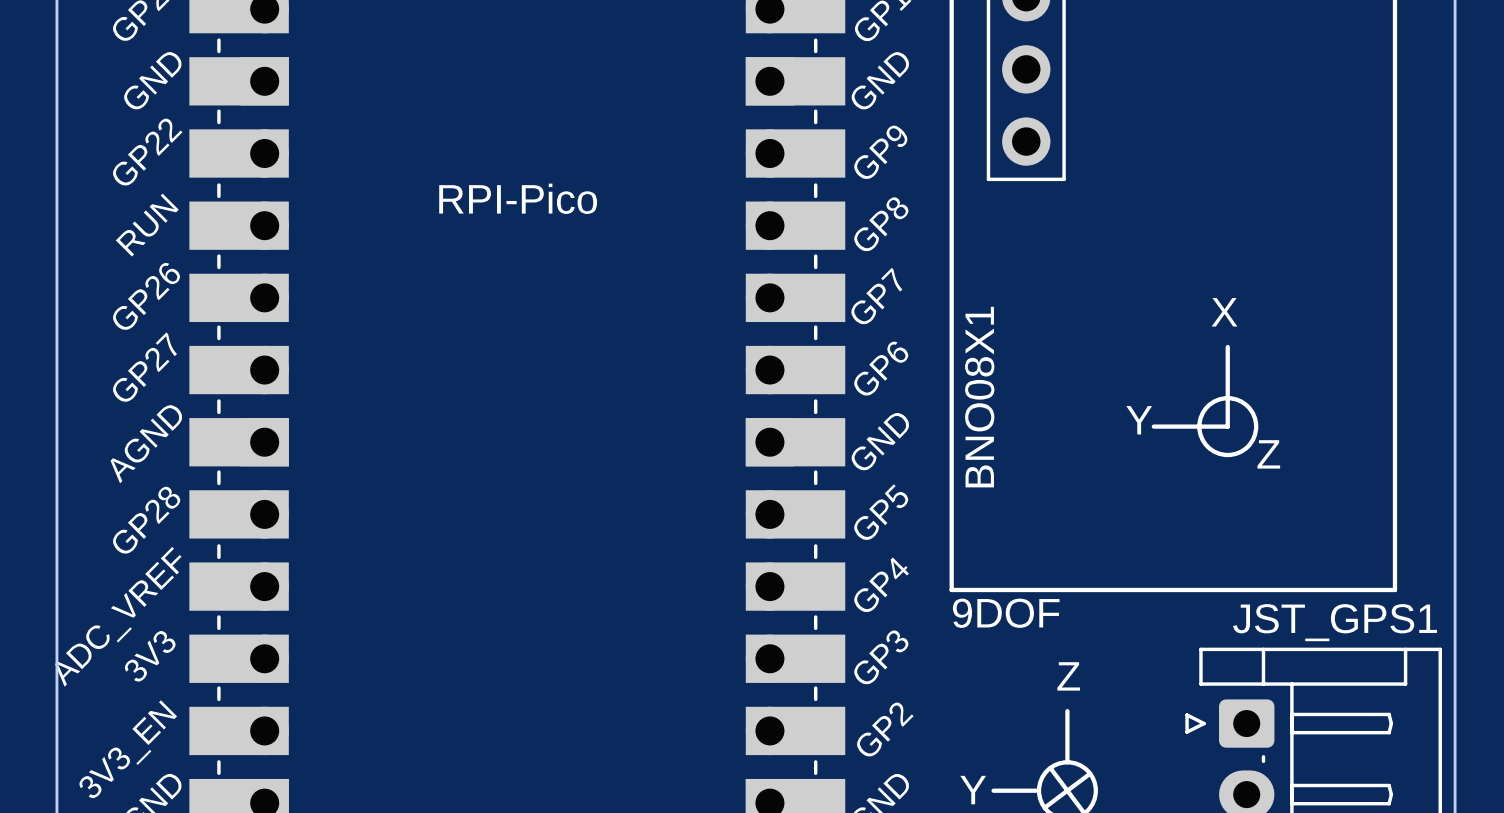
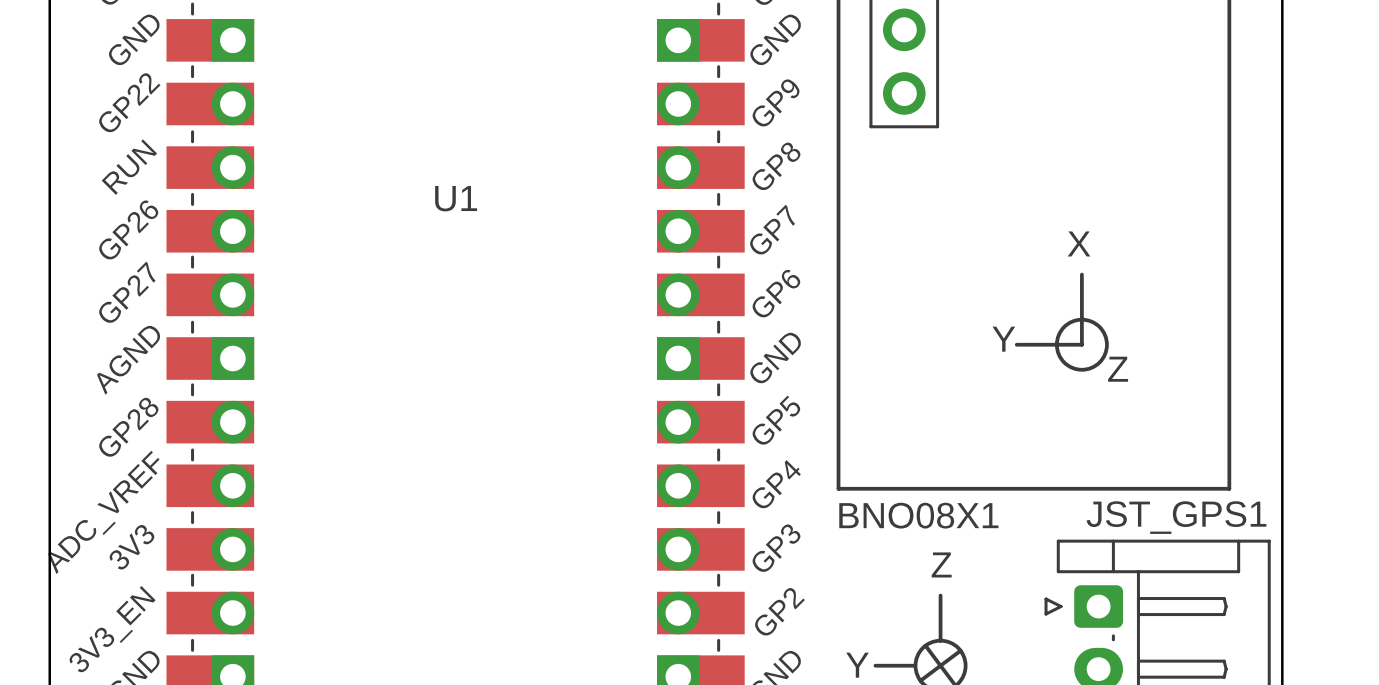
U1 value: RPI-Pico (518, 198) -> none
U1 name: none -> U1 (456, 198)
BNO08X1 name rotation: 0° (979, 397) -> 90° clockwise (918, 515)
BNO08X1 name position: BNO08X1 (979, 397) -> BNO08X1 (918, 515)
BNO08X1 value: 9DOF (1006, 613) -> none

